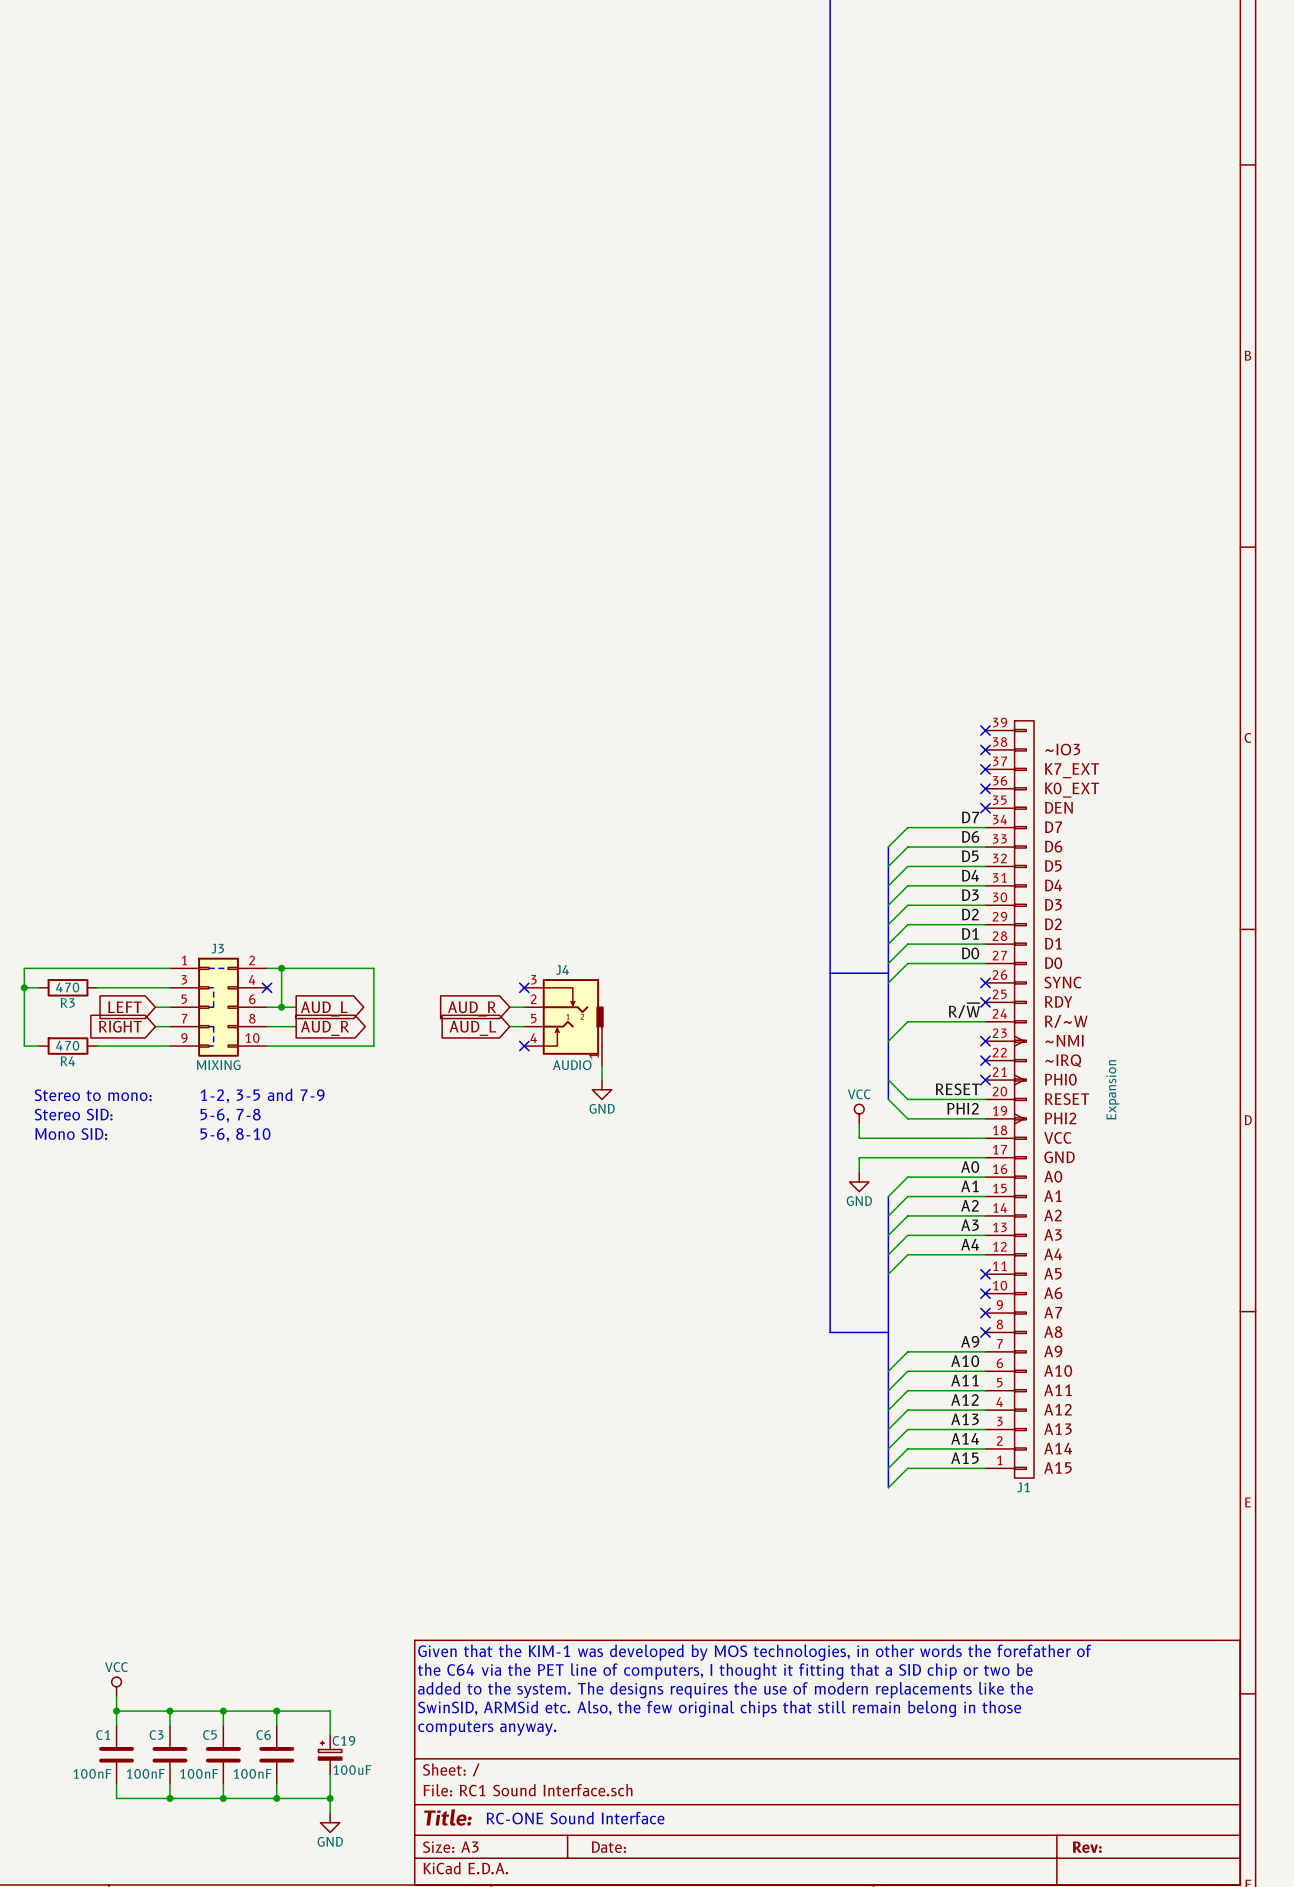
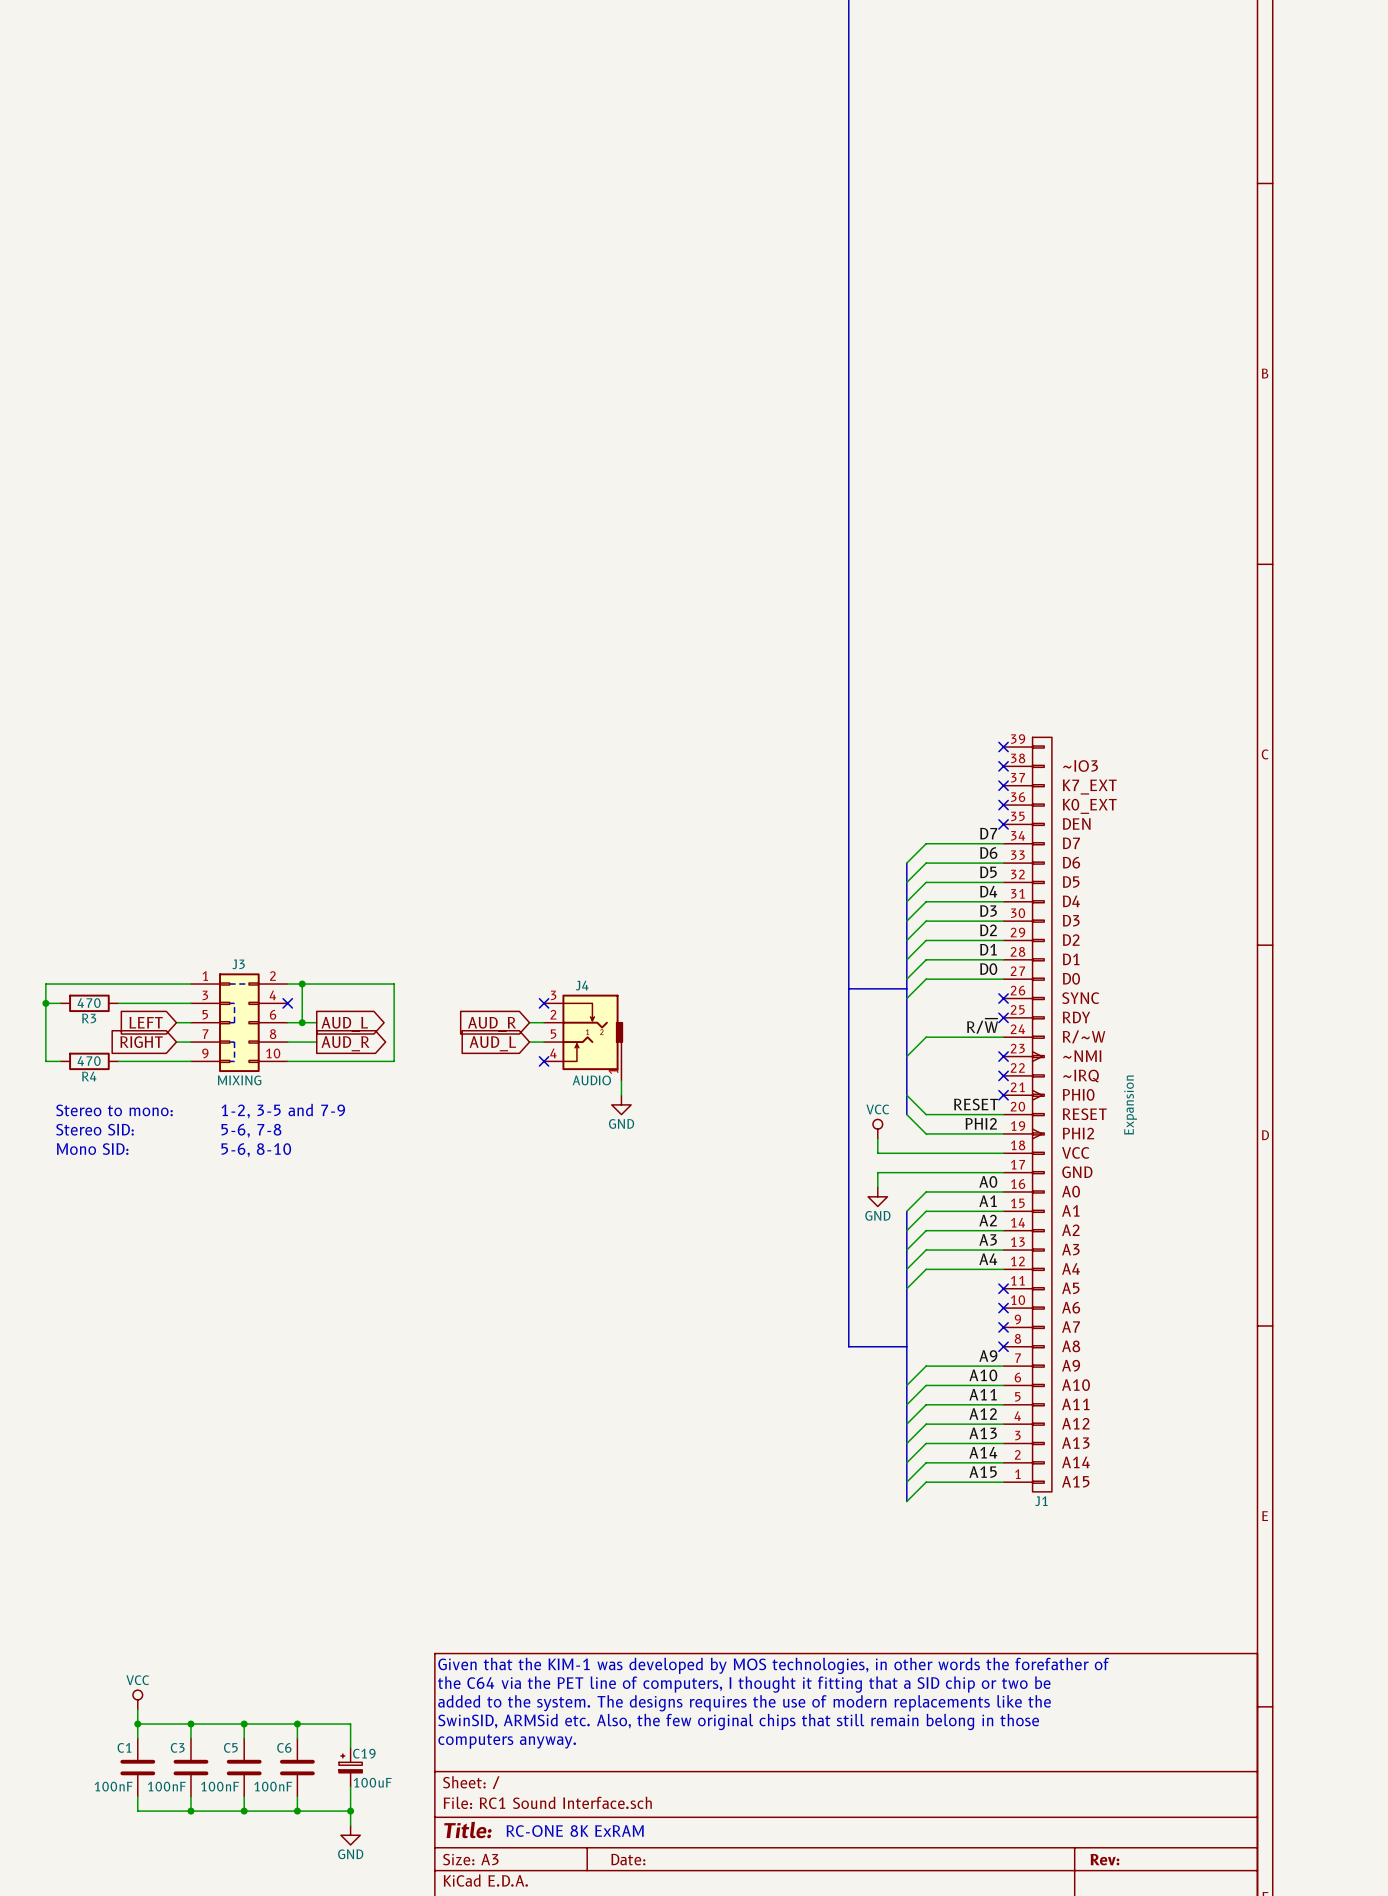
text: RC-ONE Sound Interface (575, 1818) -> RC-ONE 8K ExRAM (575, 1831)

